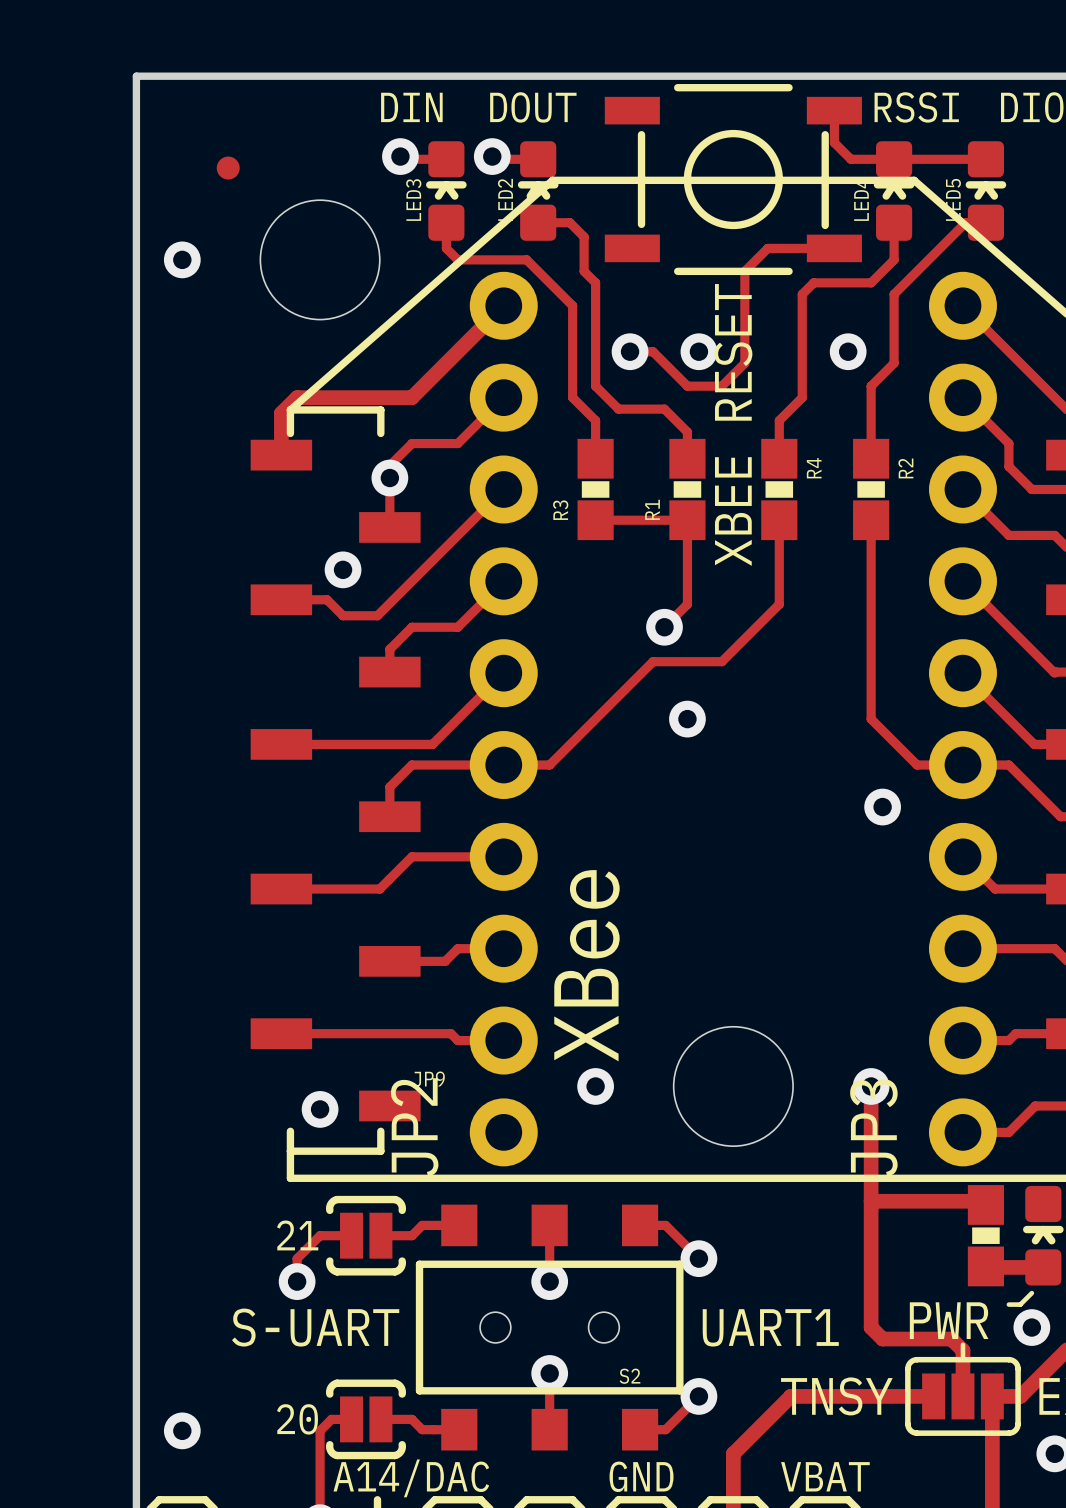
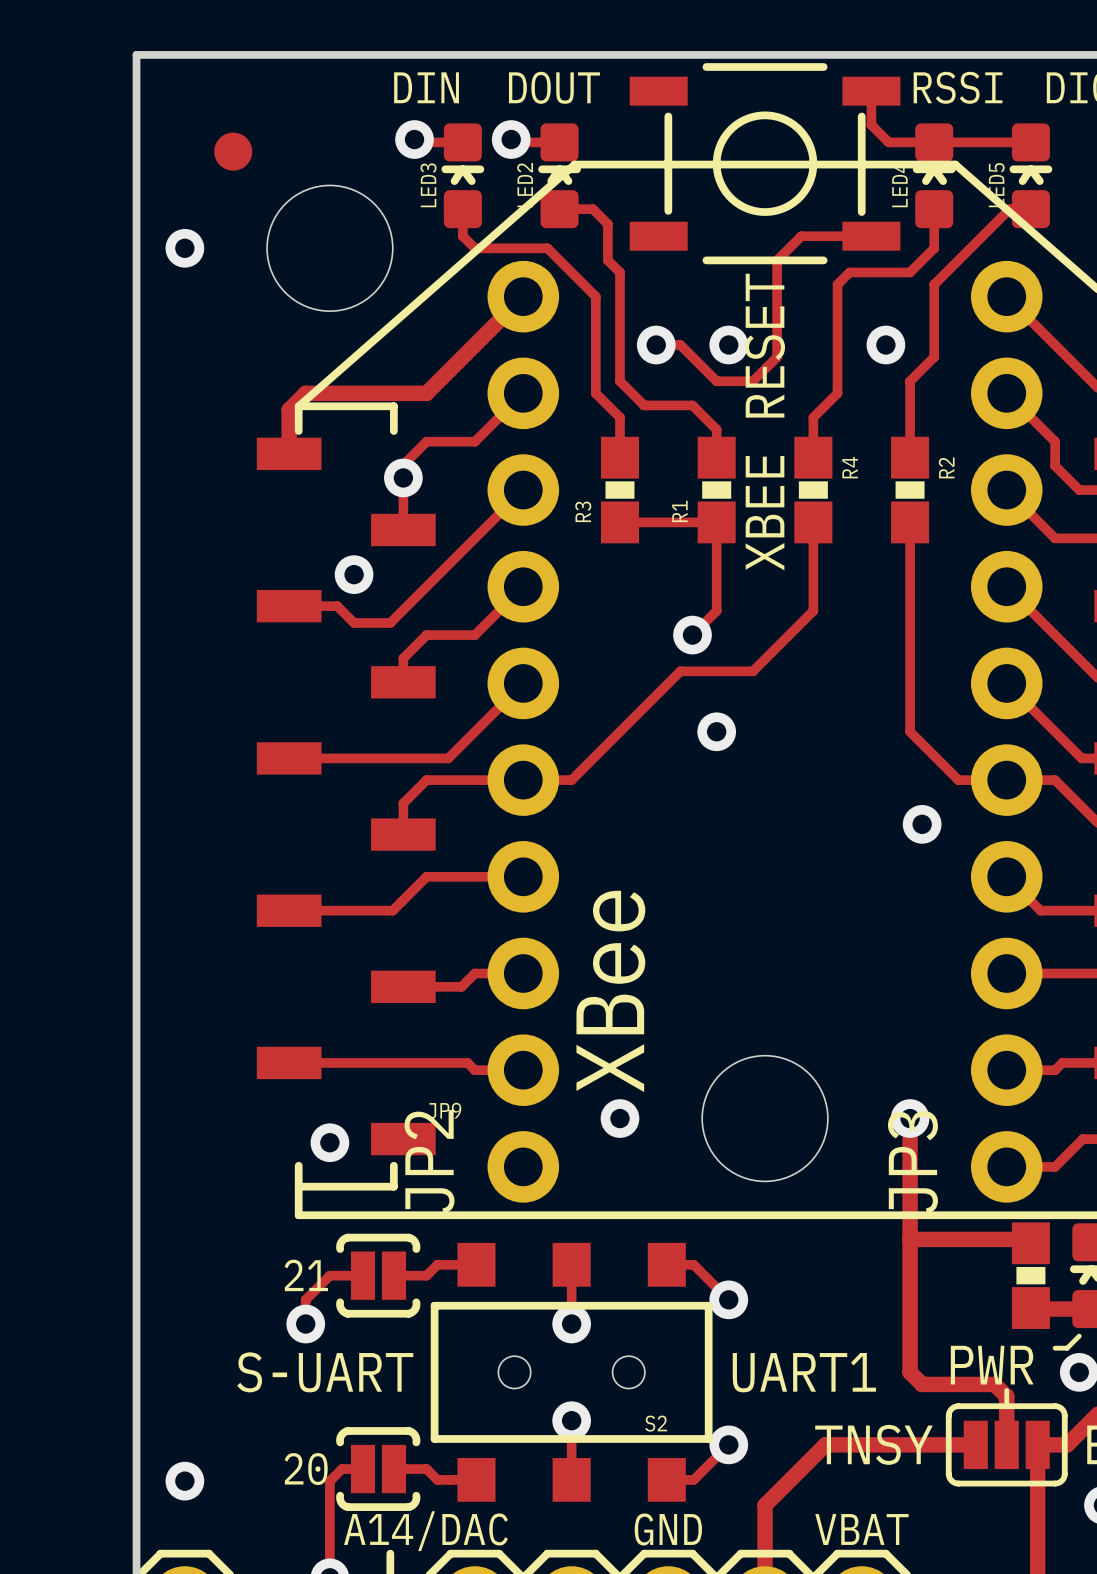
part footprint: [216, 156, 240, 180] -> [214, 132, 253, 171]

